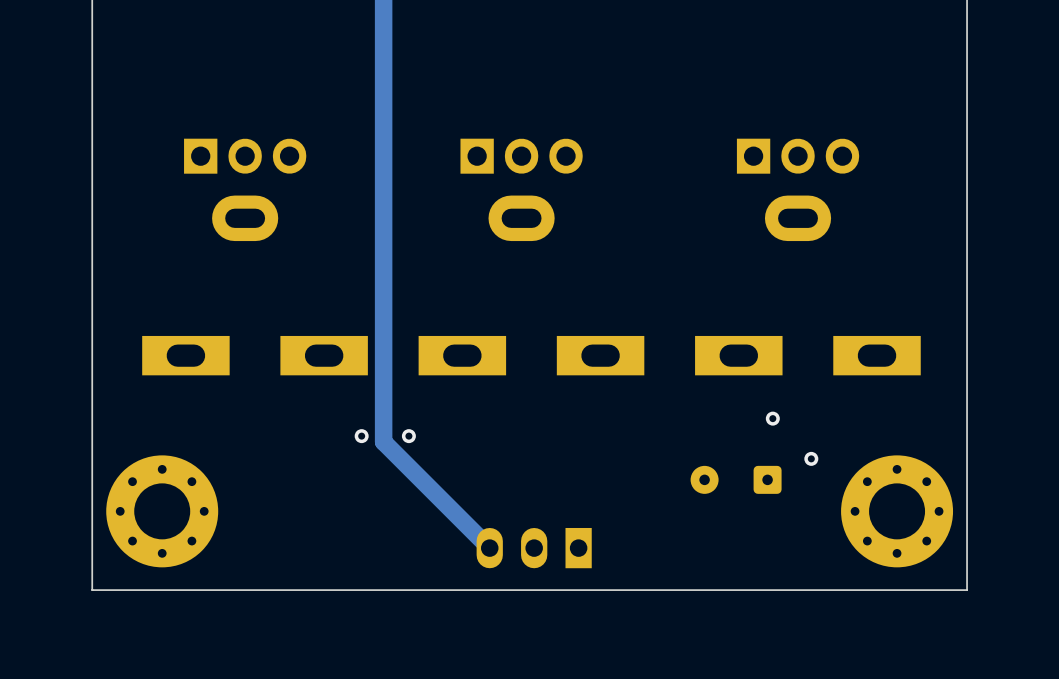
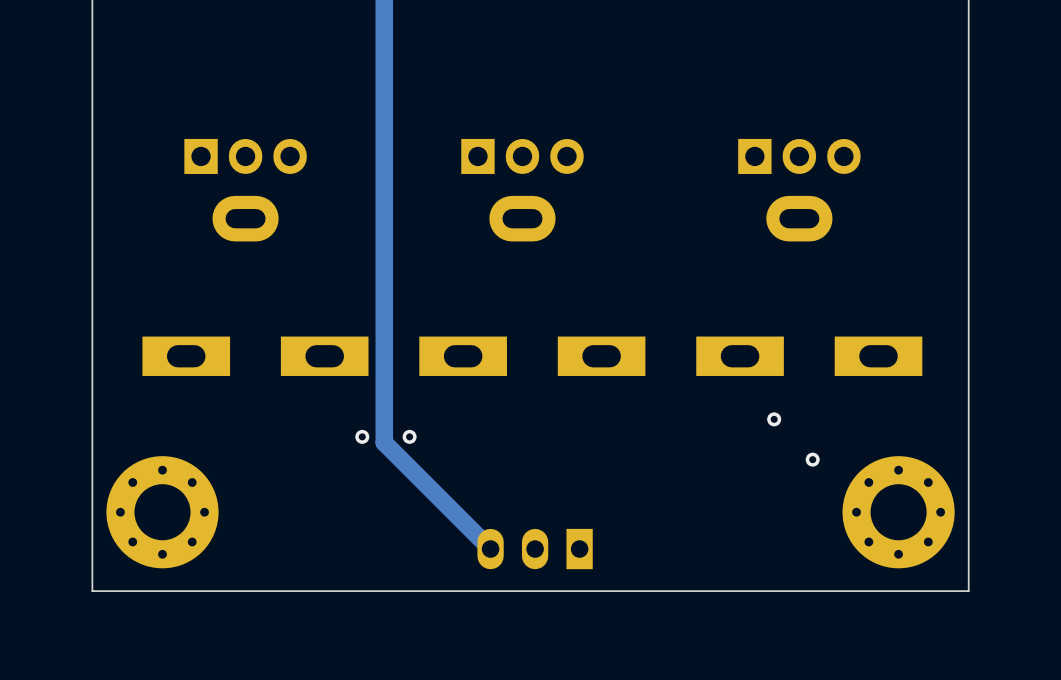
part: (736, 479) -> none

